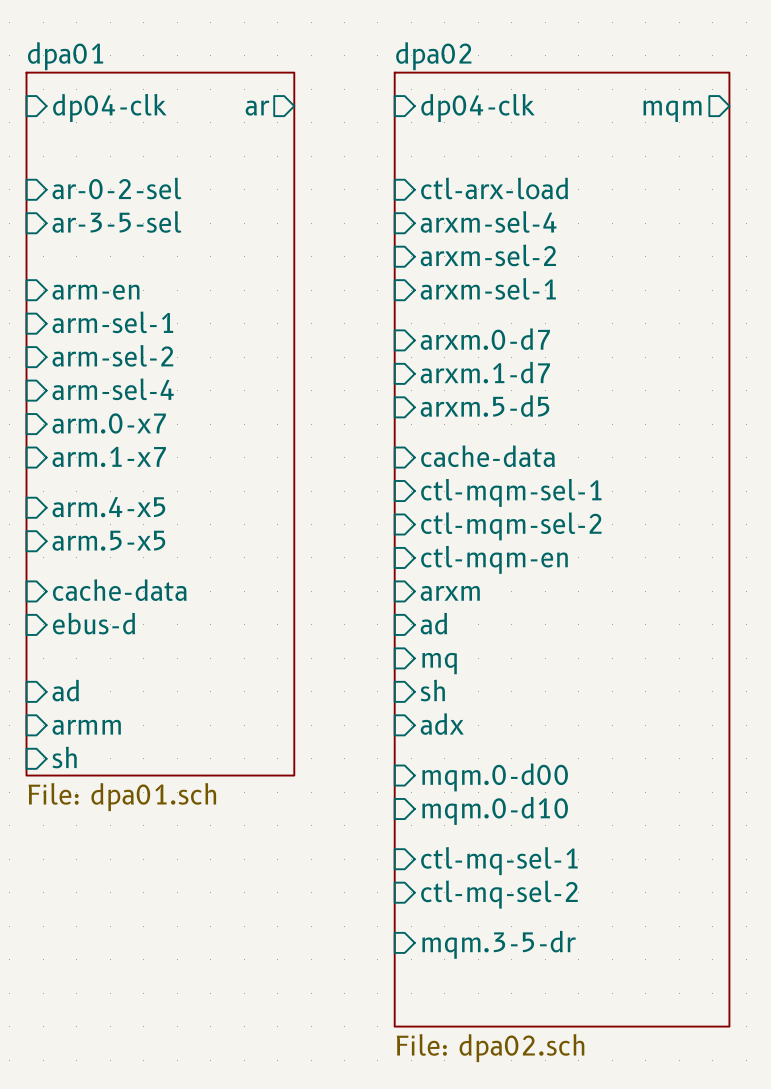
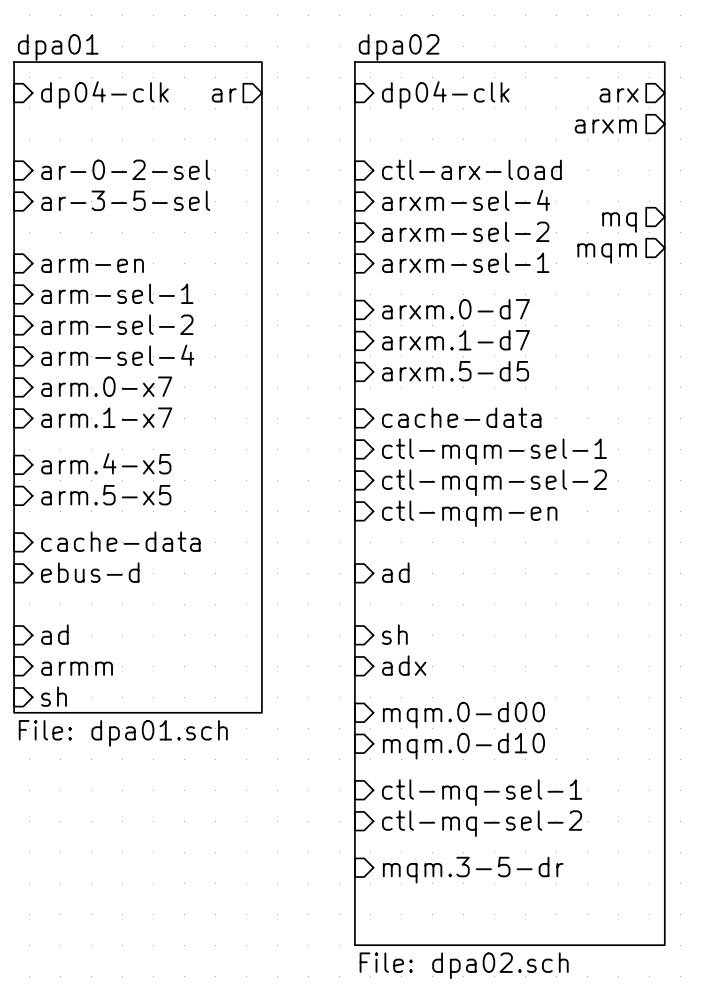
sheet pin: mqm (672, 111) -> arx (619, 95)
sheet pin: none -> arxm (605, 126)
sheet pin: none -> mq (619, 222)
sheet pin: none -> mqm (607, 253)
sheet pin: arxm (450, 593) -> none
sheet pin: mq (439, 663) -> none

